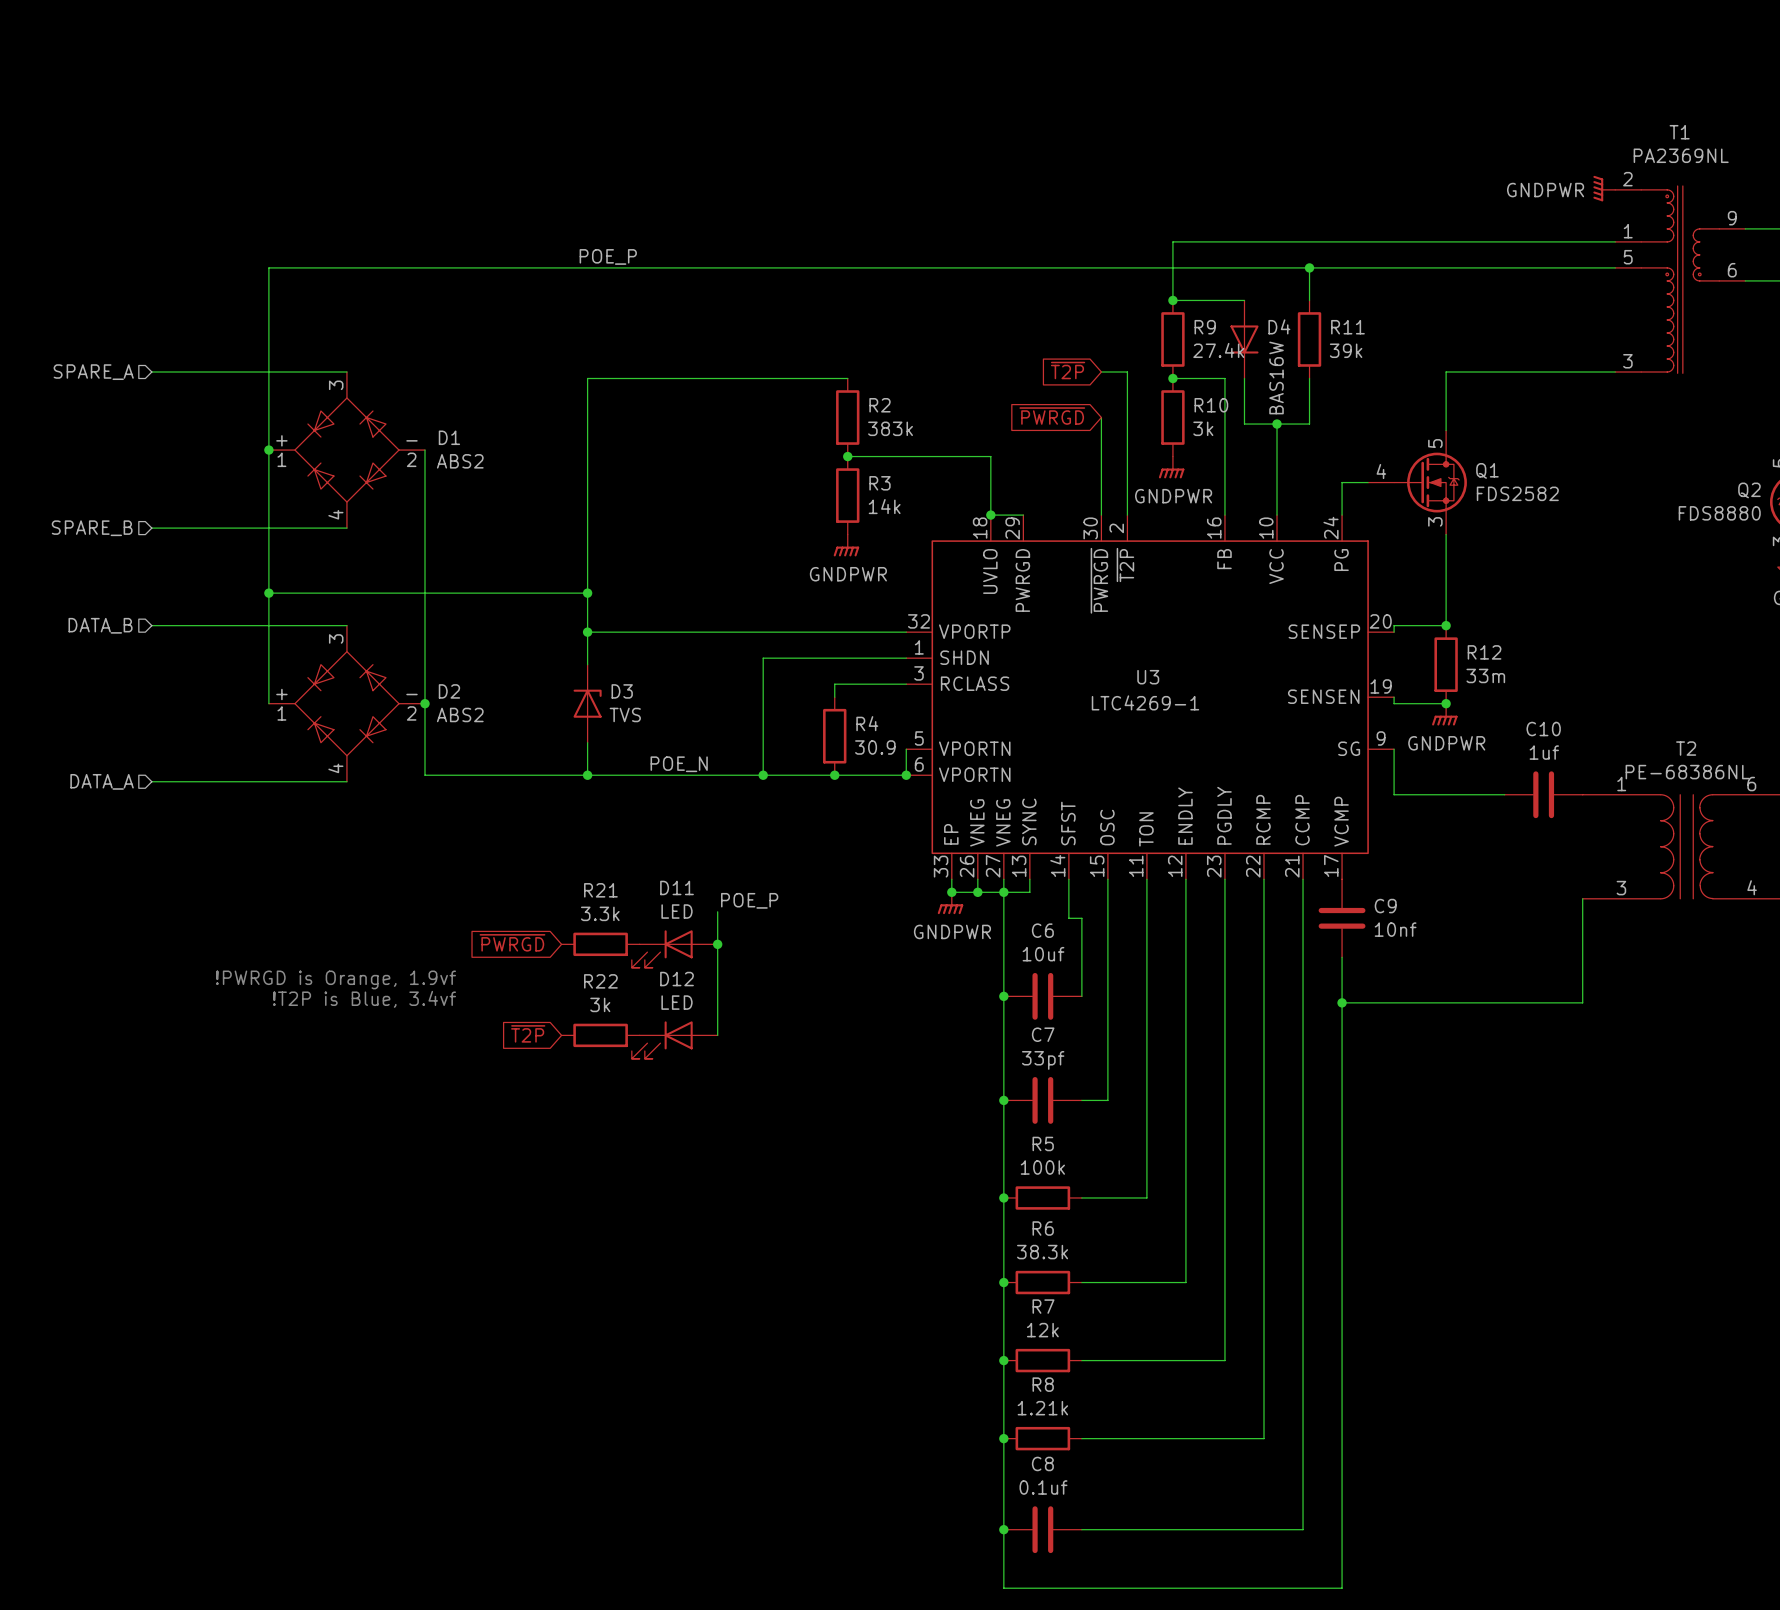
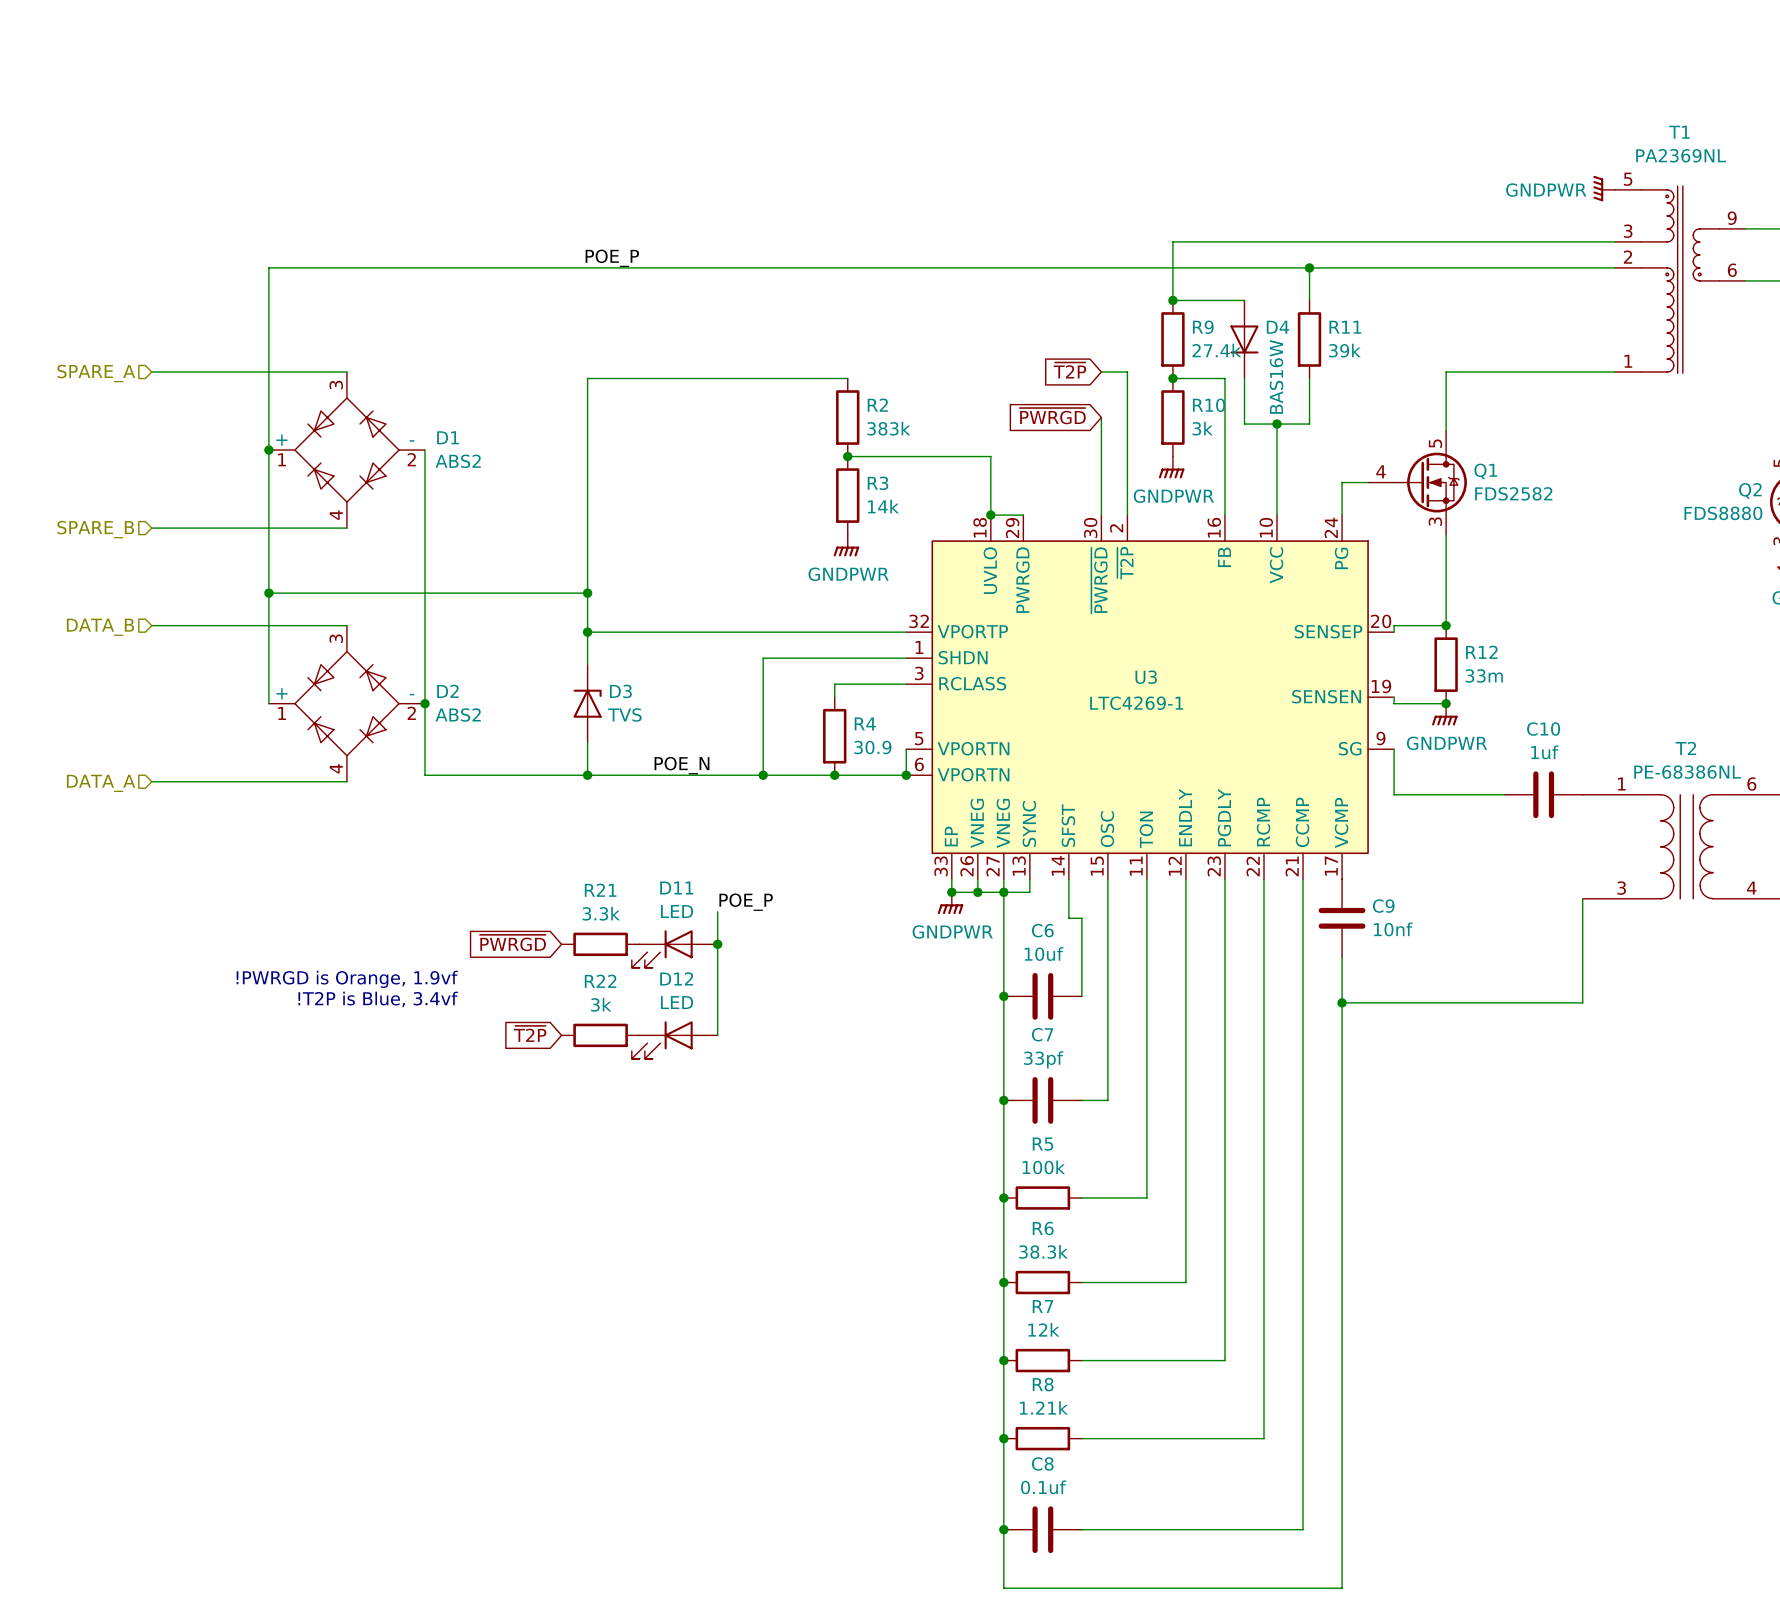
T1 pin number: 2 (1627, 179) -> 5 (1628, 179)
T1 pin number: 1 (1628, 231) -> 3 (1628, 231)
T1 pin number: 5 (1628, 257) -> 2 (1627, 257)
T1 pin number: 3 (1627, 361) -> 1 (1628, 361)

